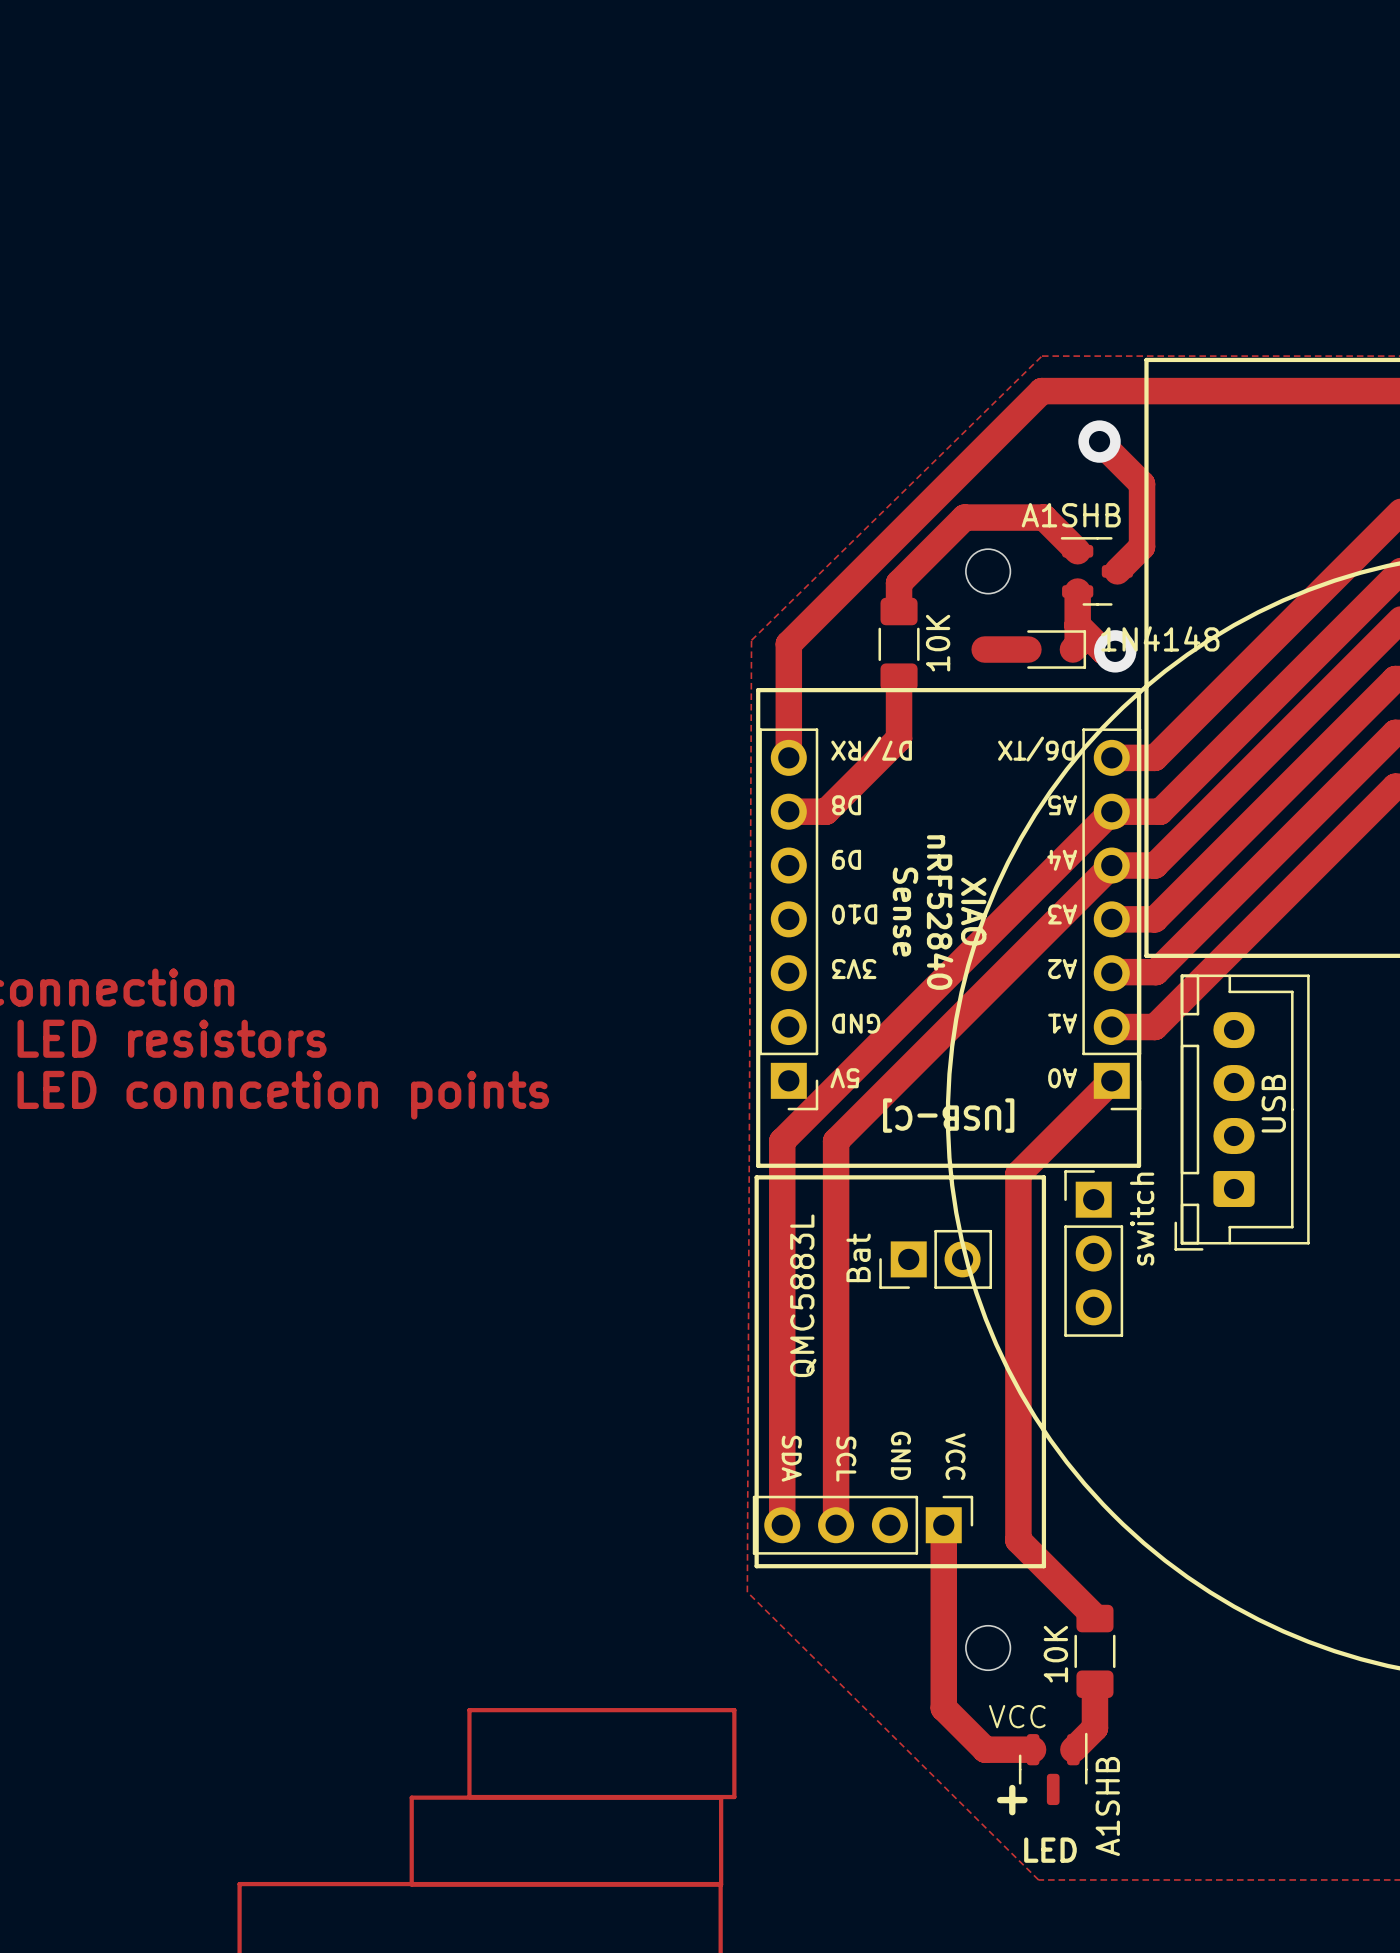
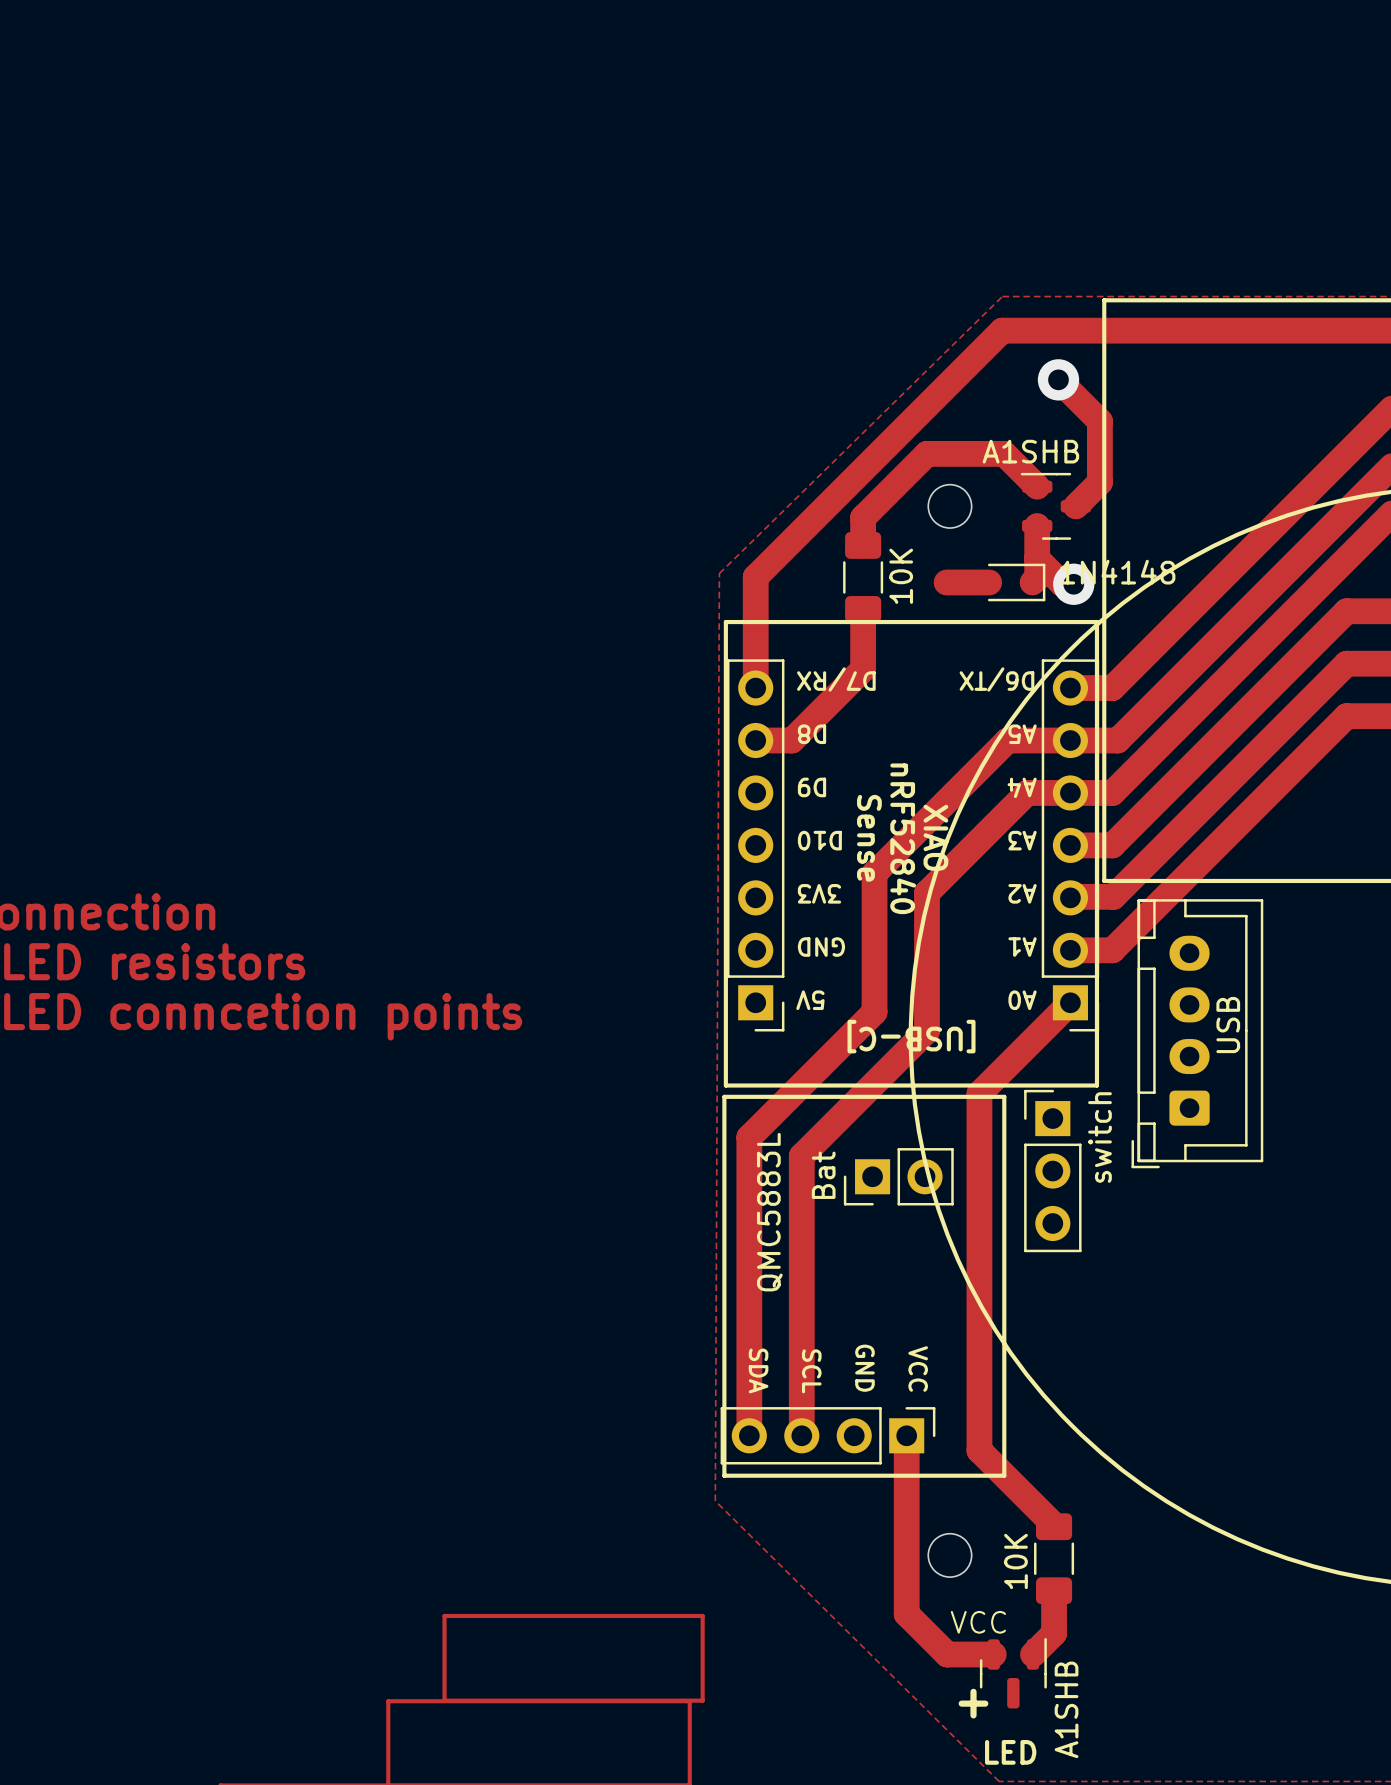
track: (1111, 811) (782, 1141) (782, 1218) -> (1070, 740) (1007, 740) (874, 873) (874, 1012) (749, 1137)
track: (1111, 865) (836, 1141) (836, 1238) -> (1070, 792) (1027, 792) (926, 893) (926, 1030) (801, 1156)

